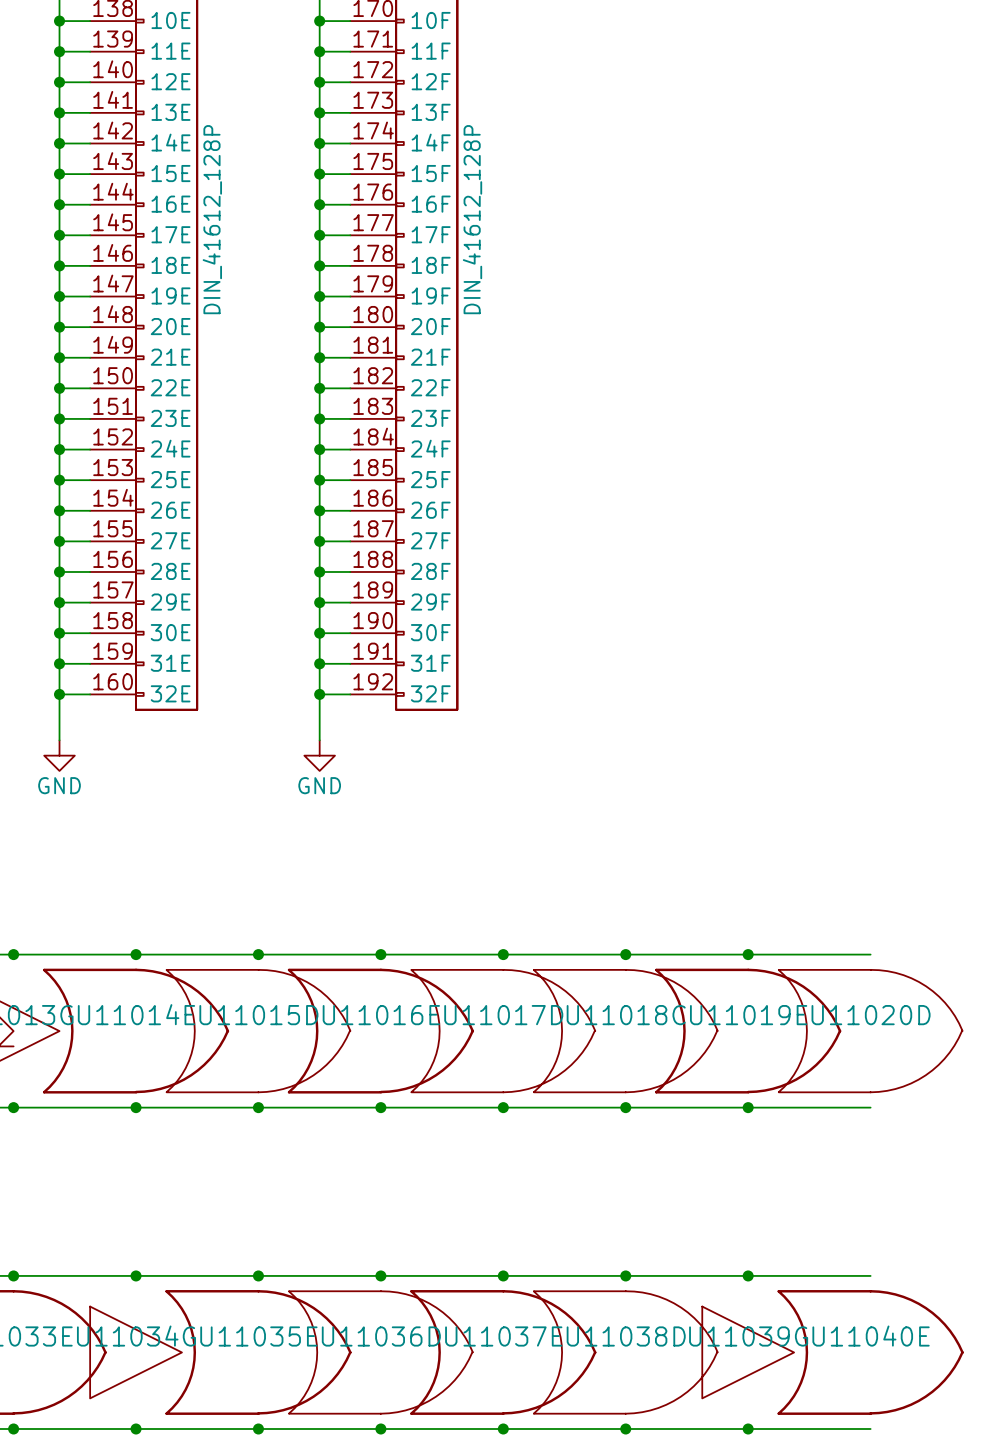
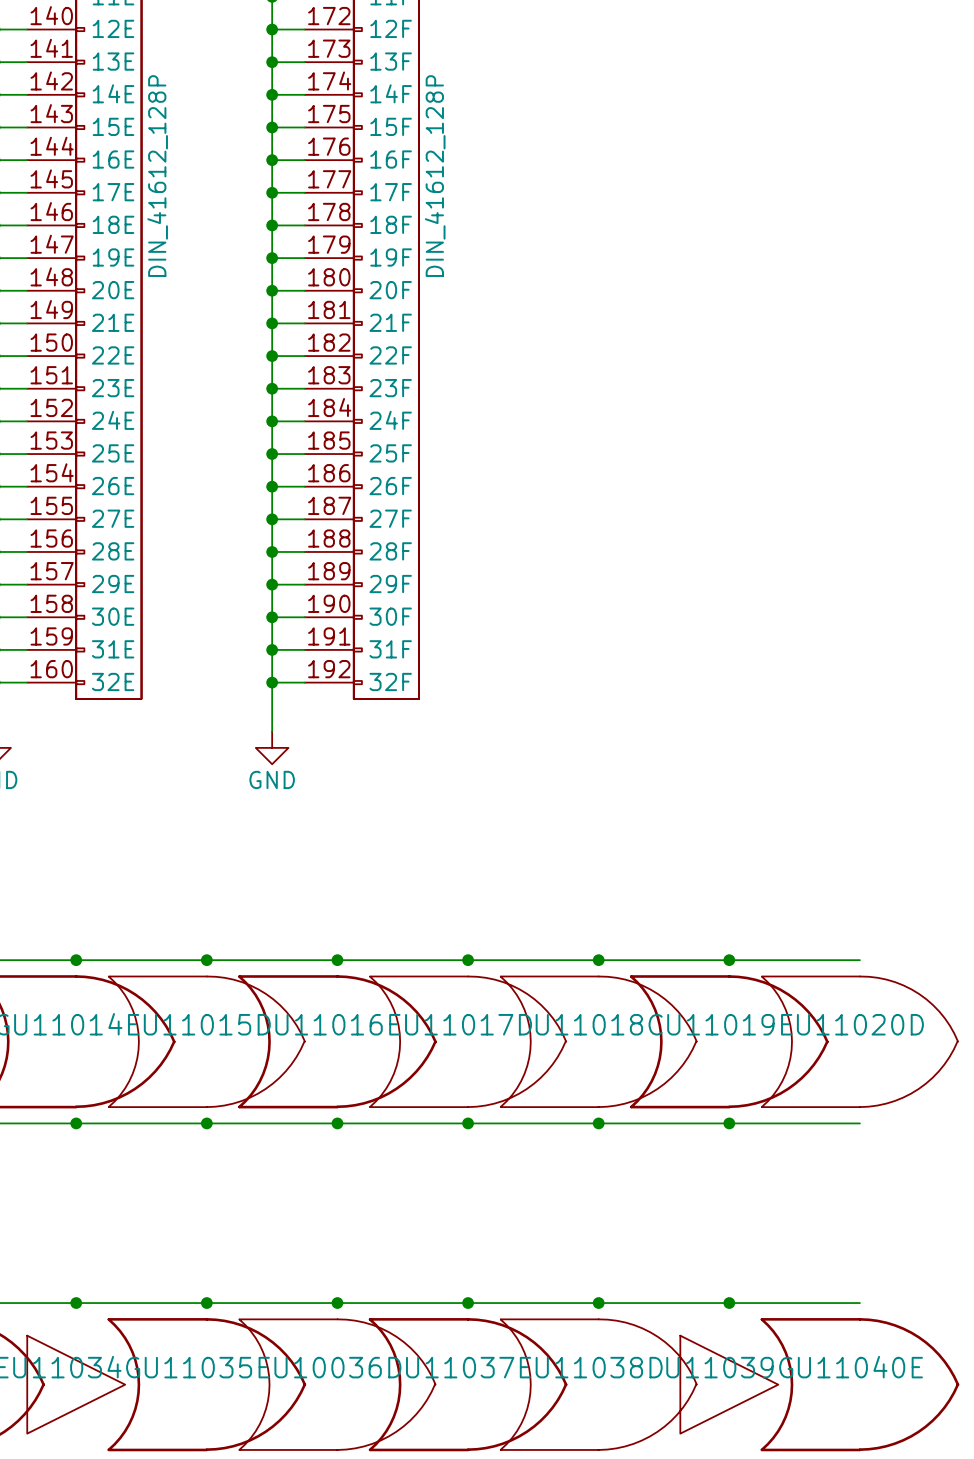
U11036D name: U11036D (381, 1336) -> U10036D (337, 1367)

